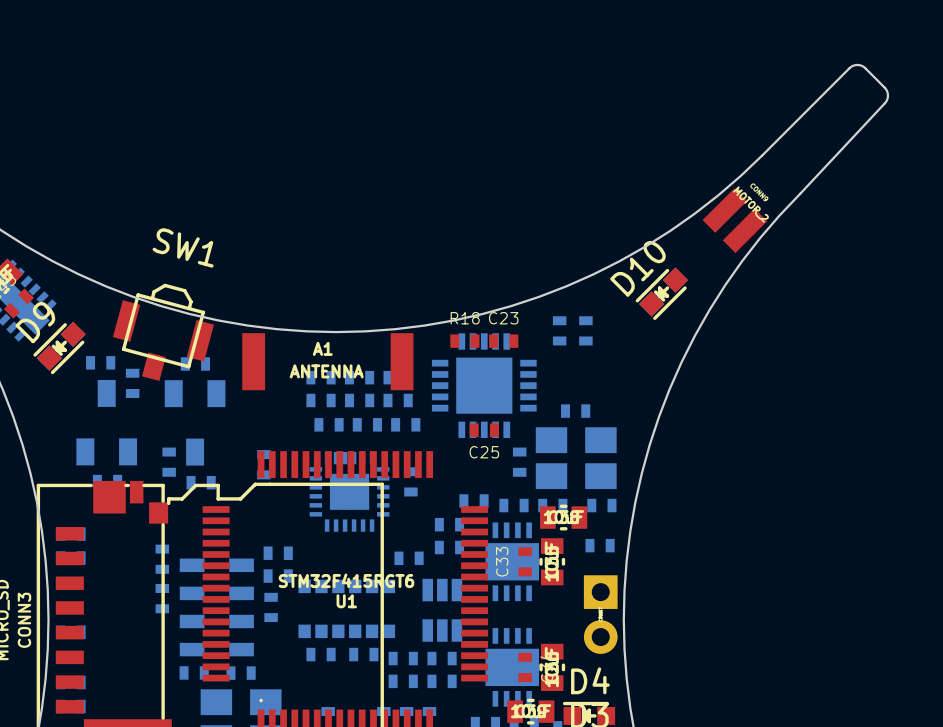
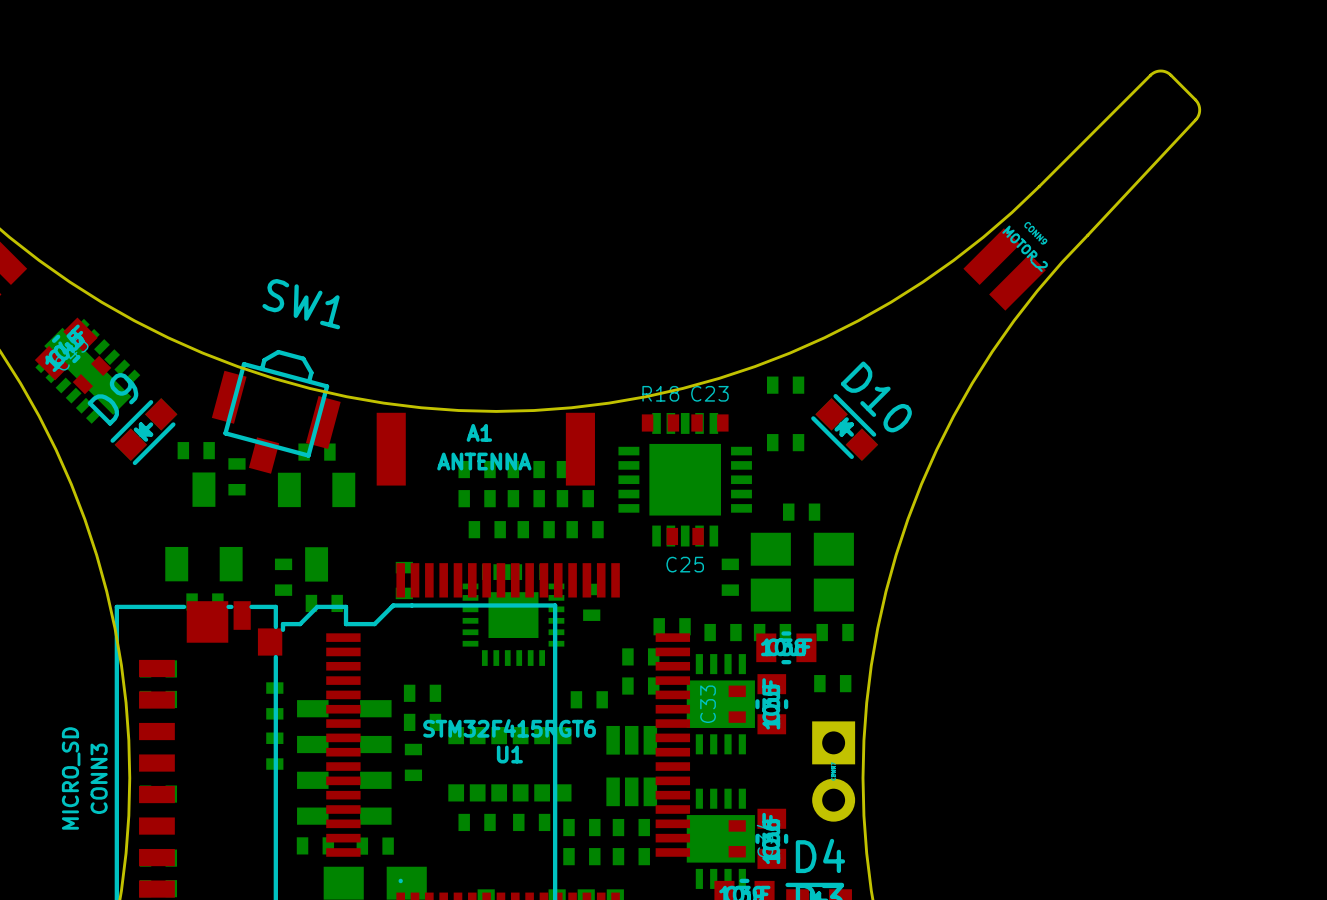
D10 rotation: 0° (661, 293) -> 90° clockwise (844, 427)
D10 position: (661, 293) -> (844, 427)
part: none -> (785, 385)
part: (559, 330) -> none
part: (585, 330) -> none
part: none -> (785, 442)

